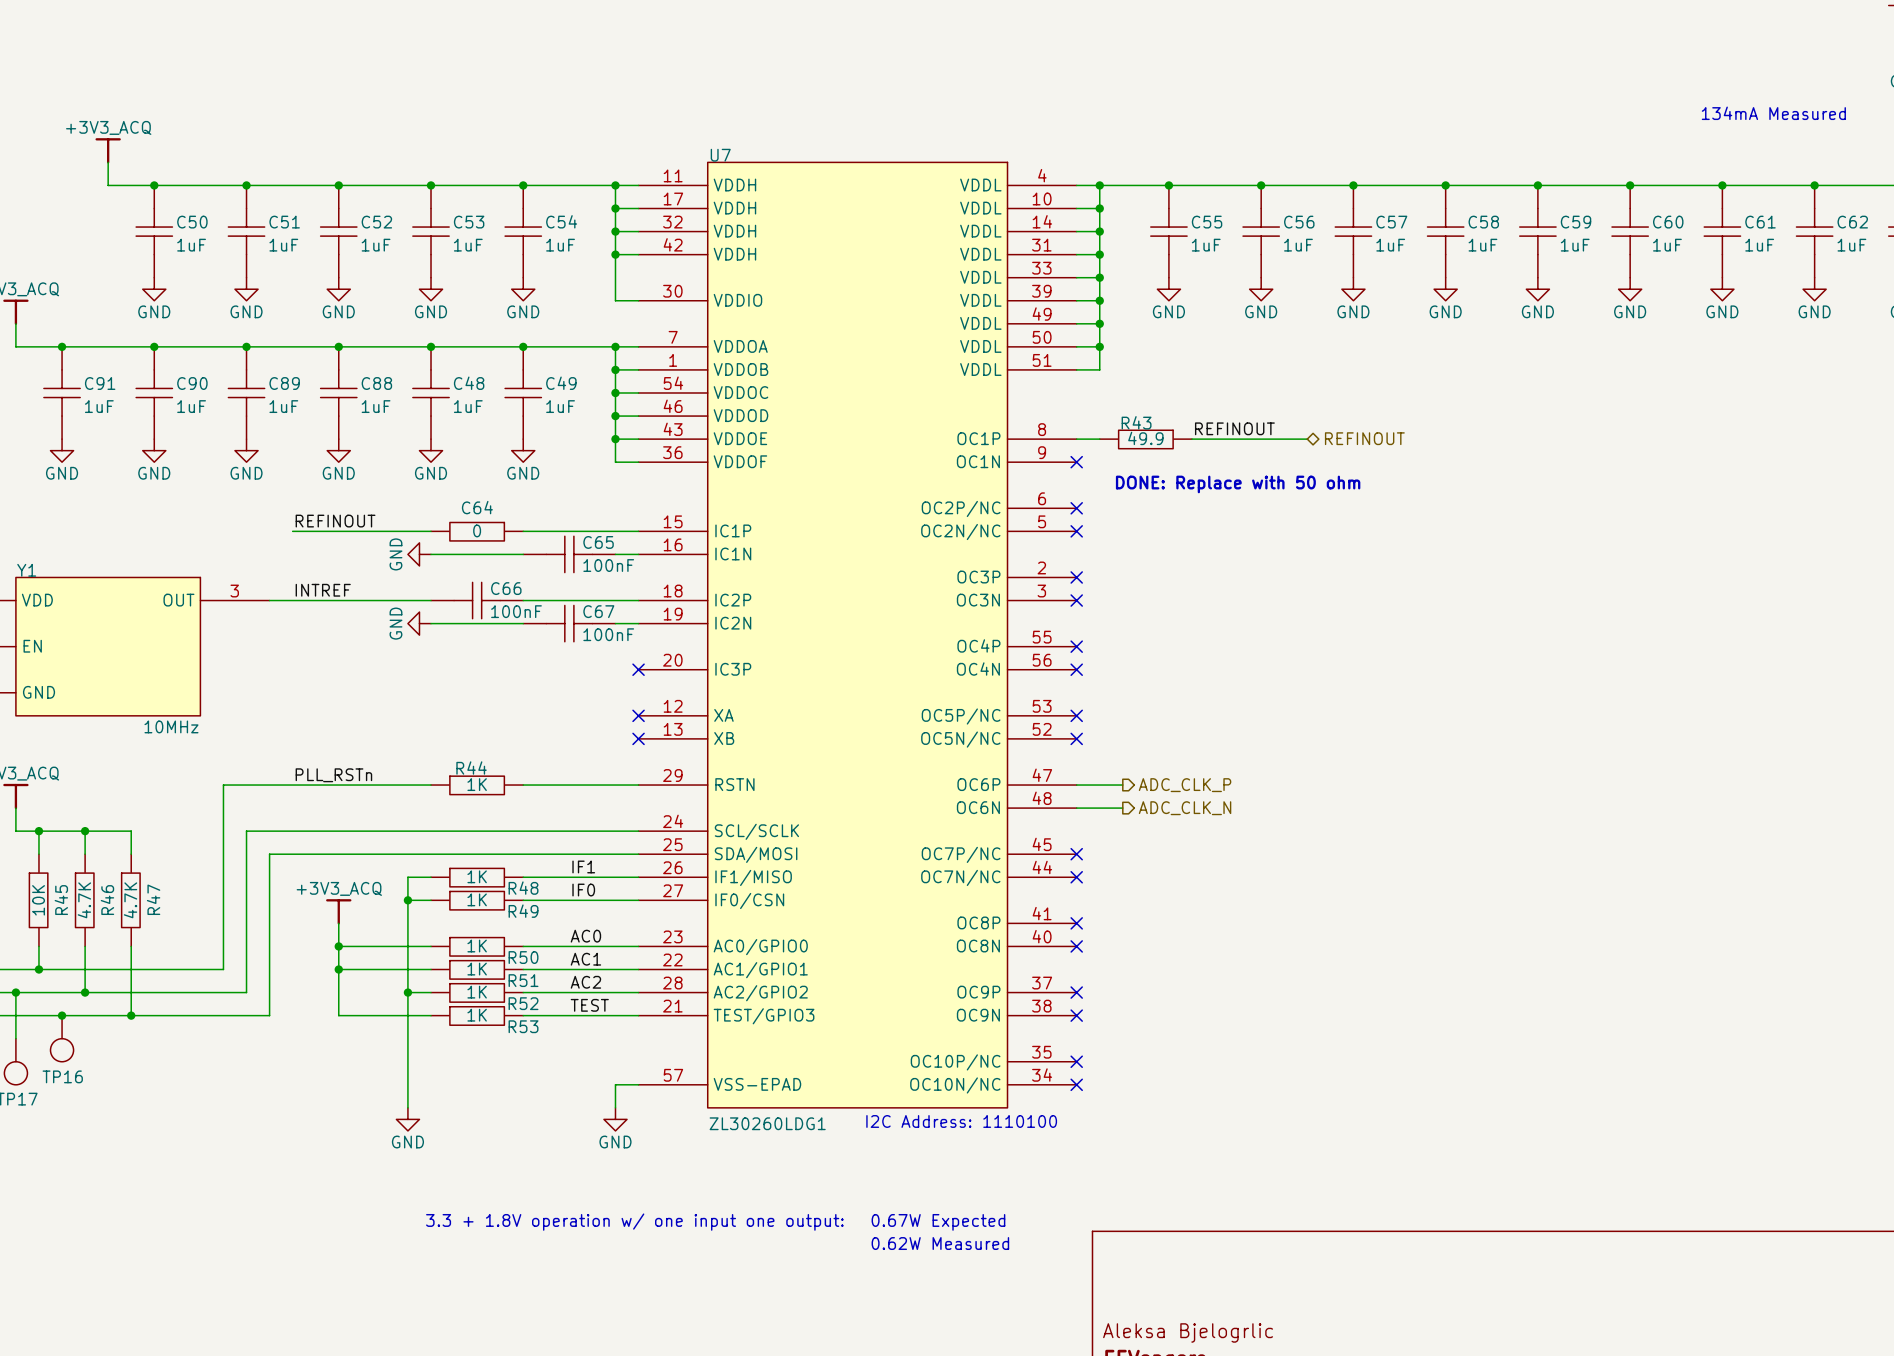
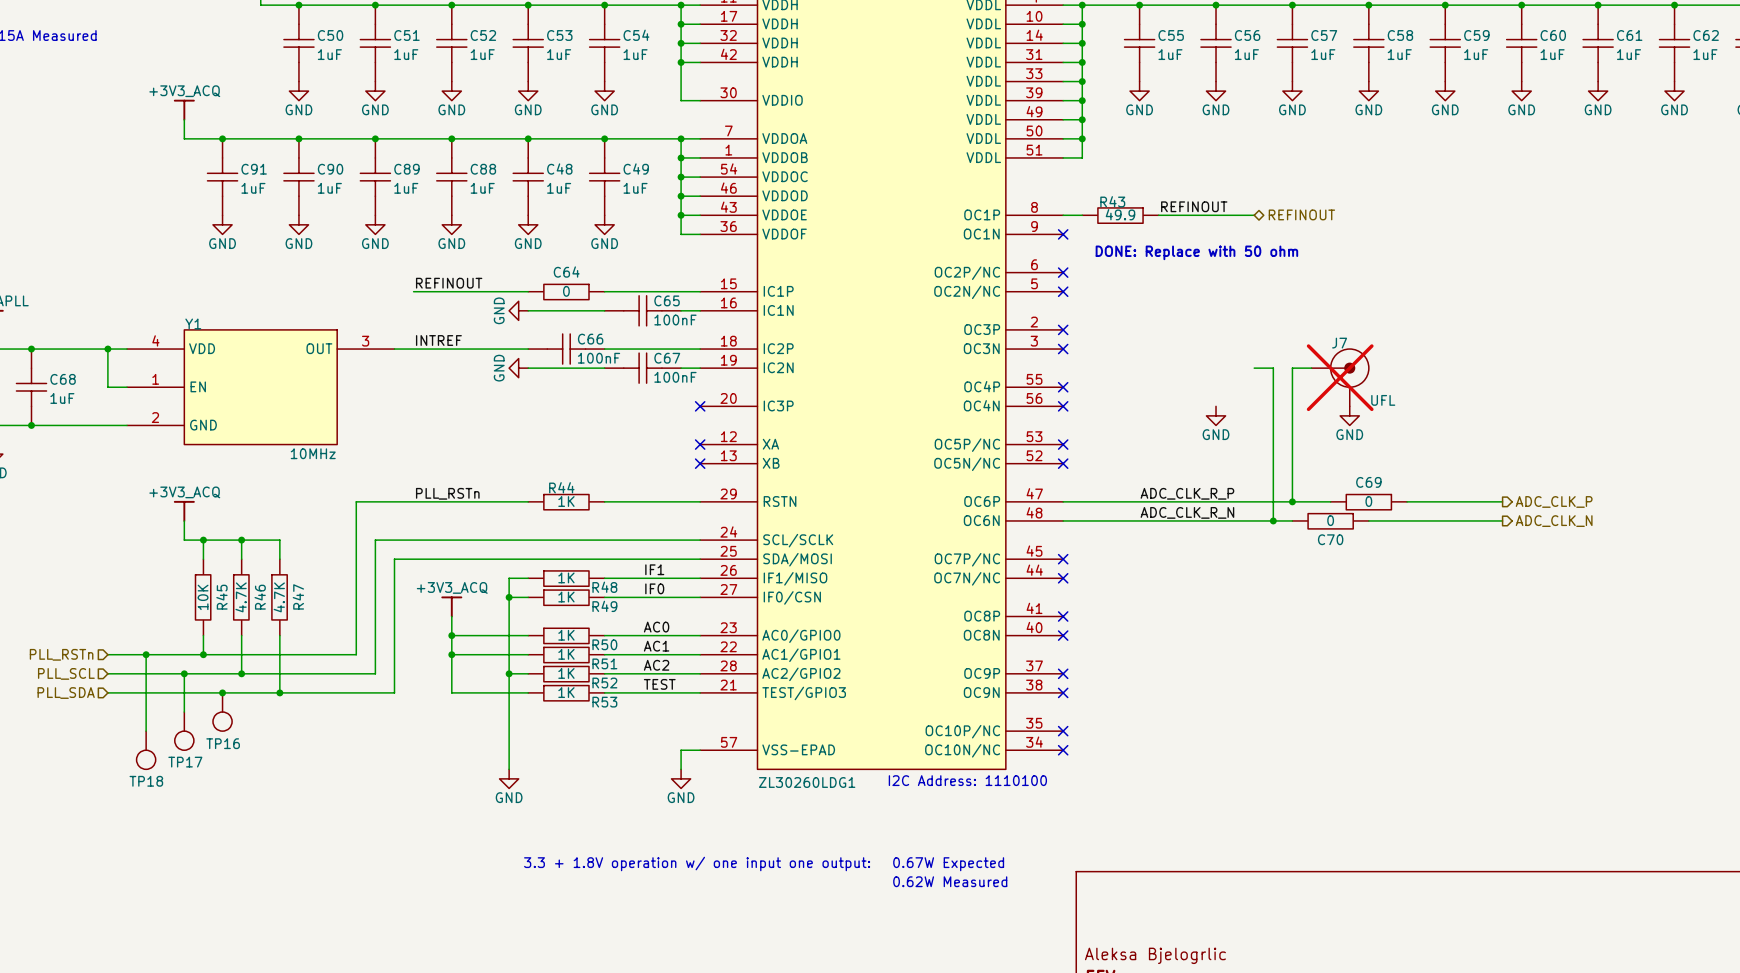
wire: none -> (1254, 368) (1273, 368) (1273, 520)
wire: none -> (1311, 368) (1292, 368) (1292, 501)
J7: none -> UFL (1340, 377)
power symbol: none -> GND (1216, 415)
power symbol: none -> GND (1349, 415)
label: none -> ADC_CLK_R_P (1187, 493)
wire: none -> (1101, 501) (1330, 501)
hierarchical label: ADC_CLK_P (1185, 785) -> none
junction: none -> (1292, 501)
C69: none -> 0 (1368, 502)
wire: none -> (1407, 501) (1502, 501)
hierarchical label: none -> ADC_CLK_P (1554, 501)
label: none -> ADC_CLK_R_N (1187, 512)
wire: none -> (1101, 520) (1292, 520)
hierarchical label: ADC_CLK_N (1185, 808) -> none
junction: none -> (1273, 520)
C70: none -> 0 (1330, 521)
wire: none -> (1368, 520) (1502, 520)
hierarchical label: none -> ADC_CLK_N (1554, 521)

